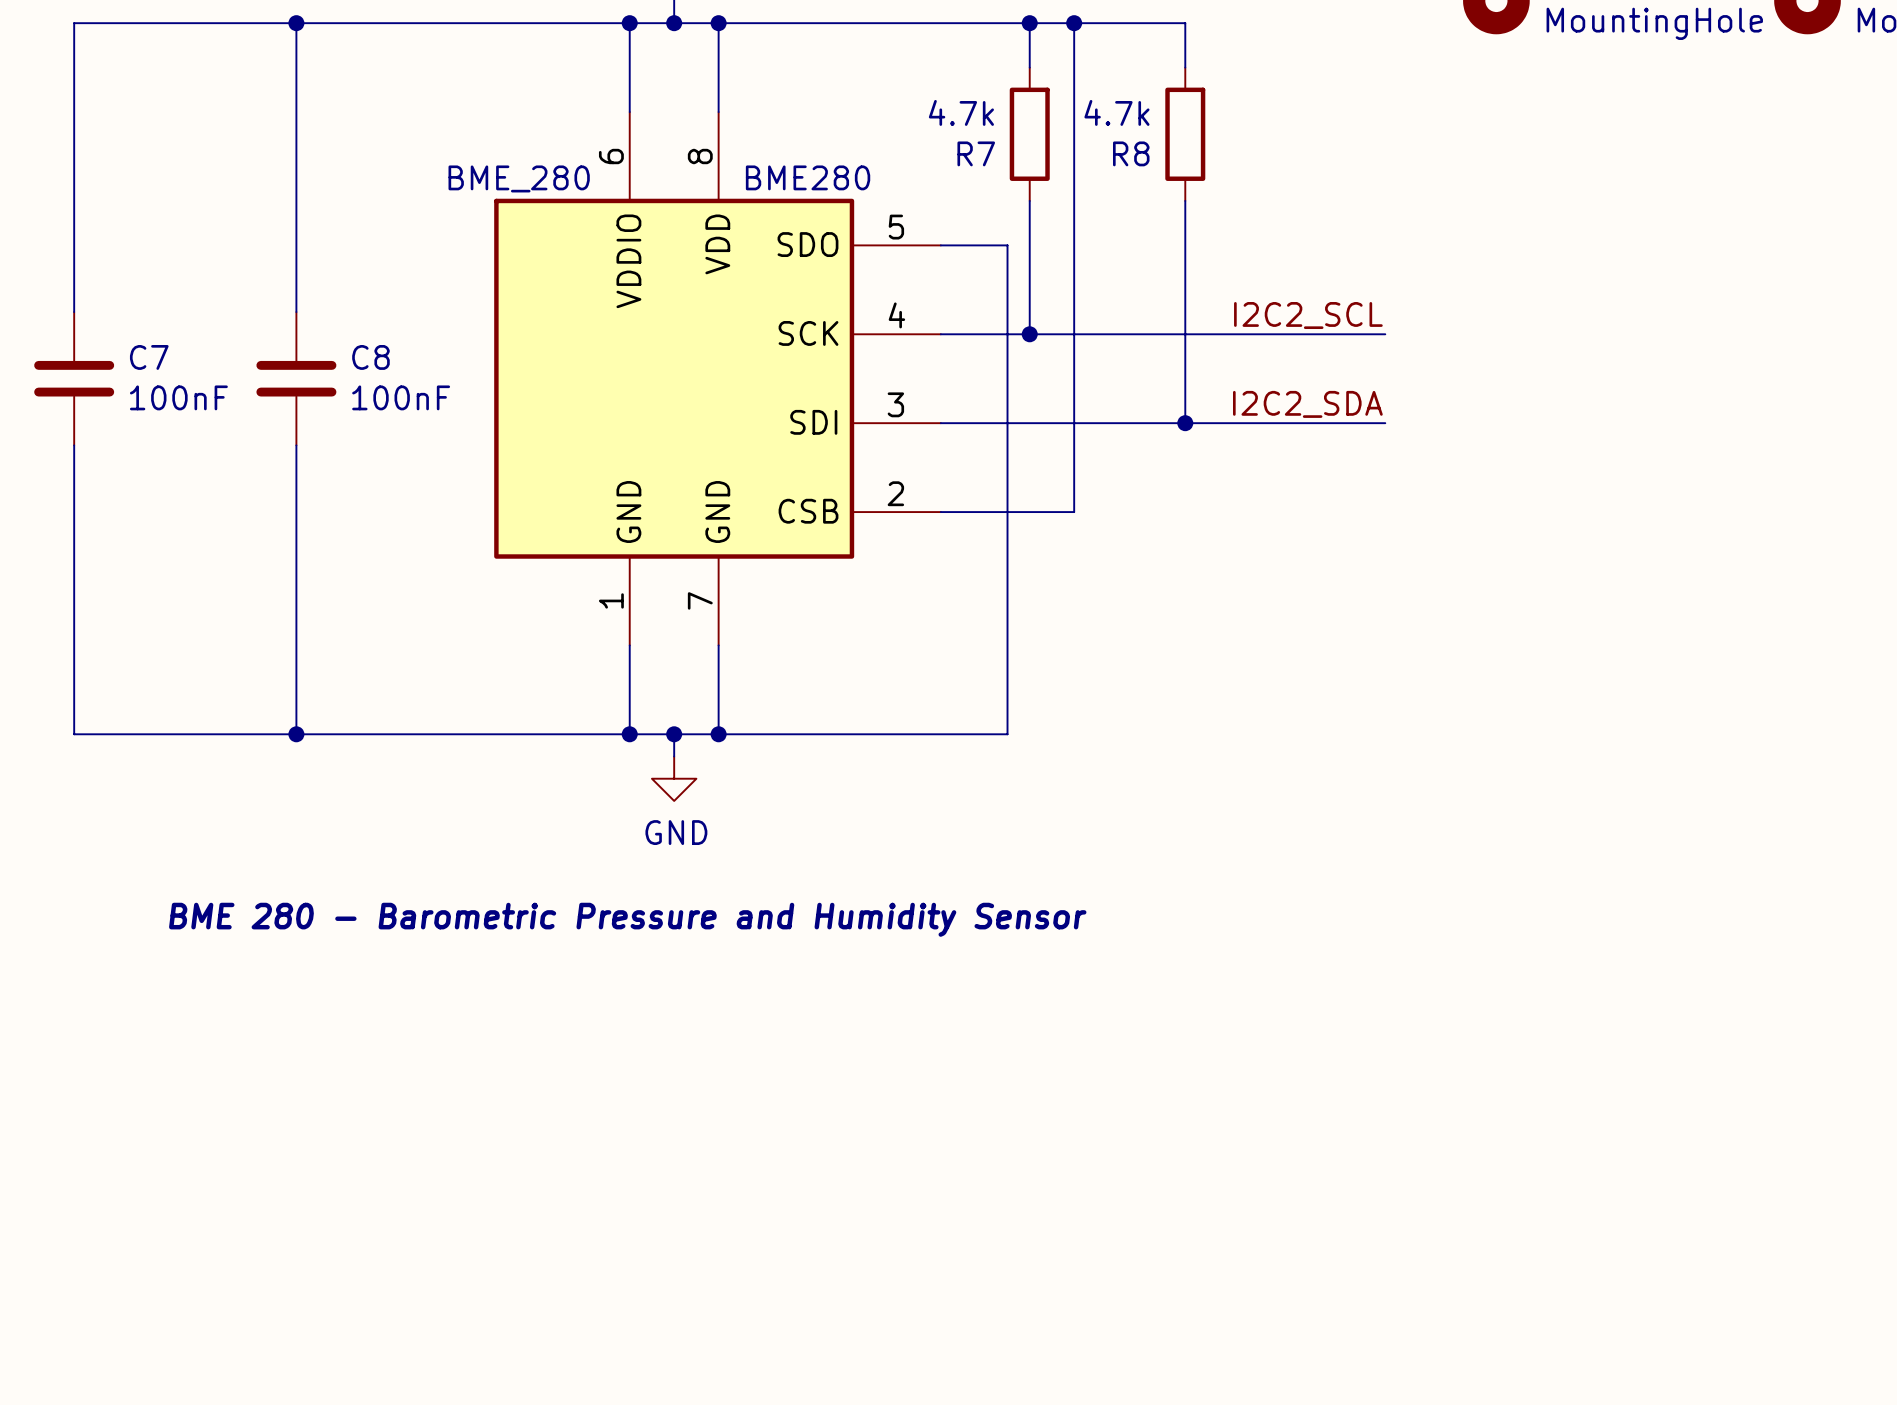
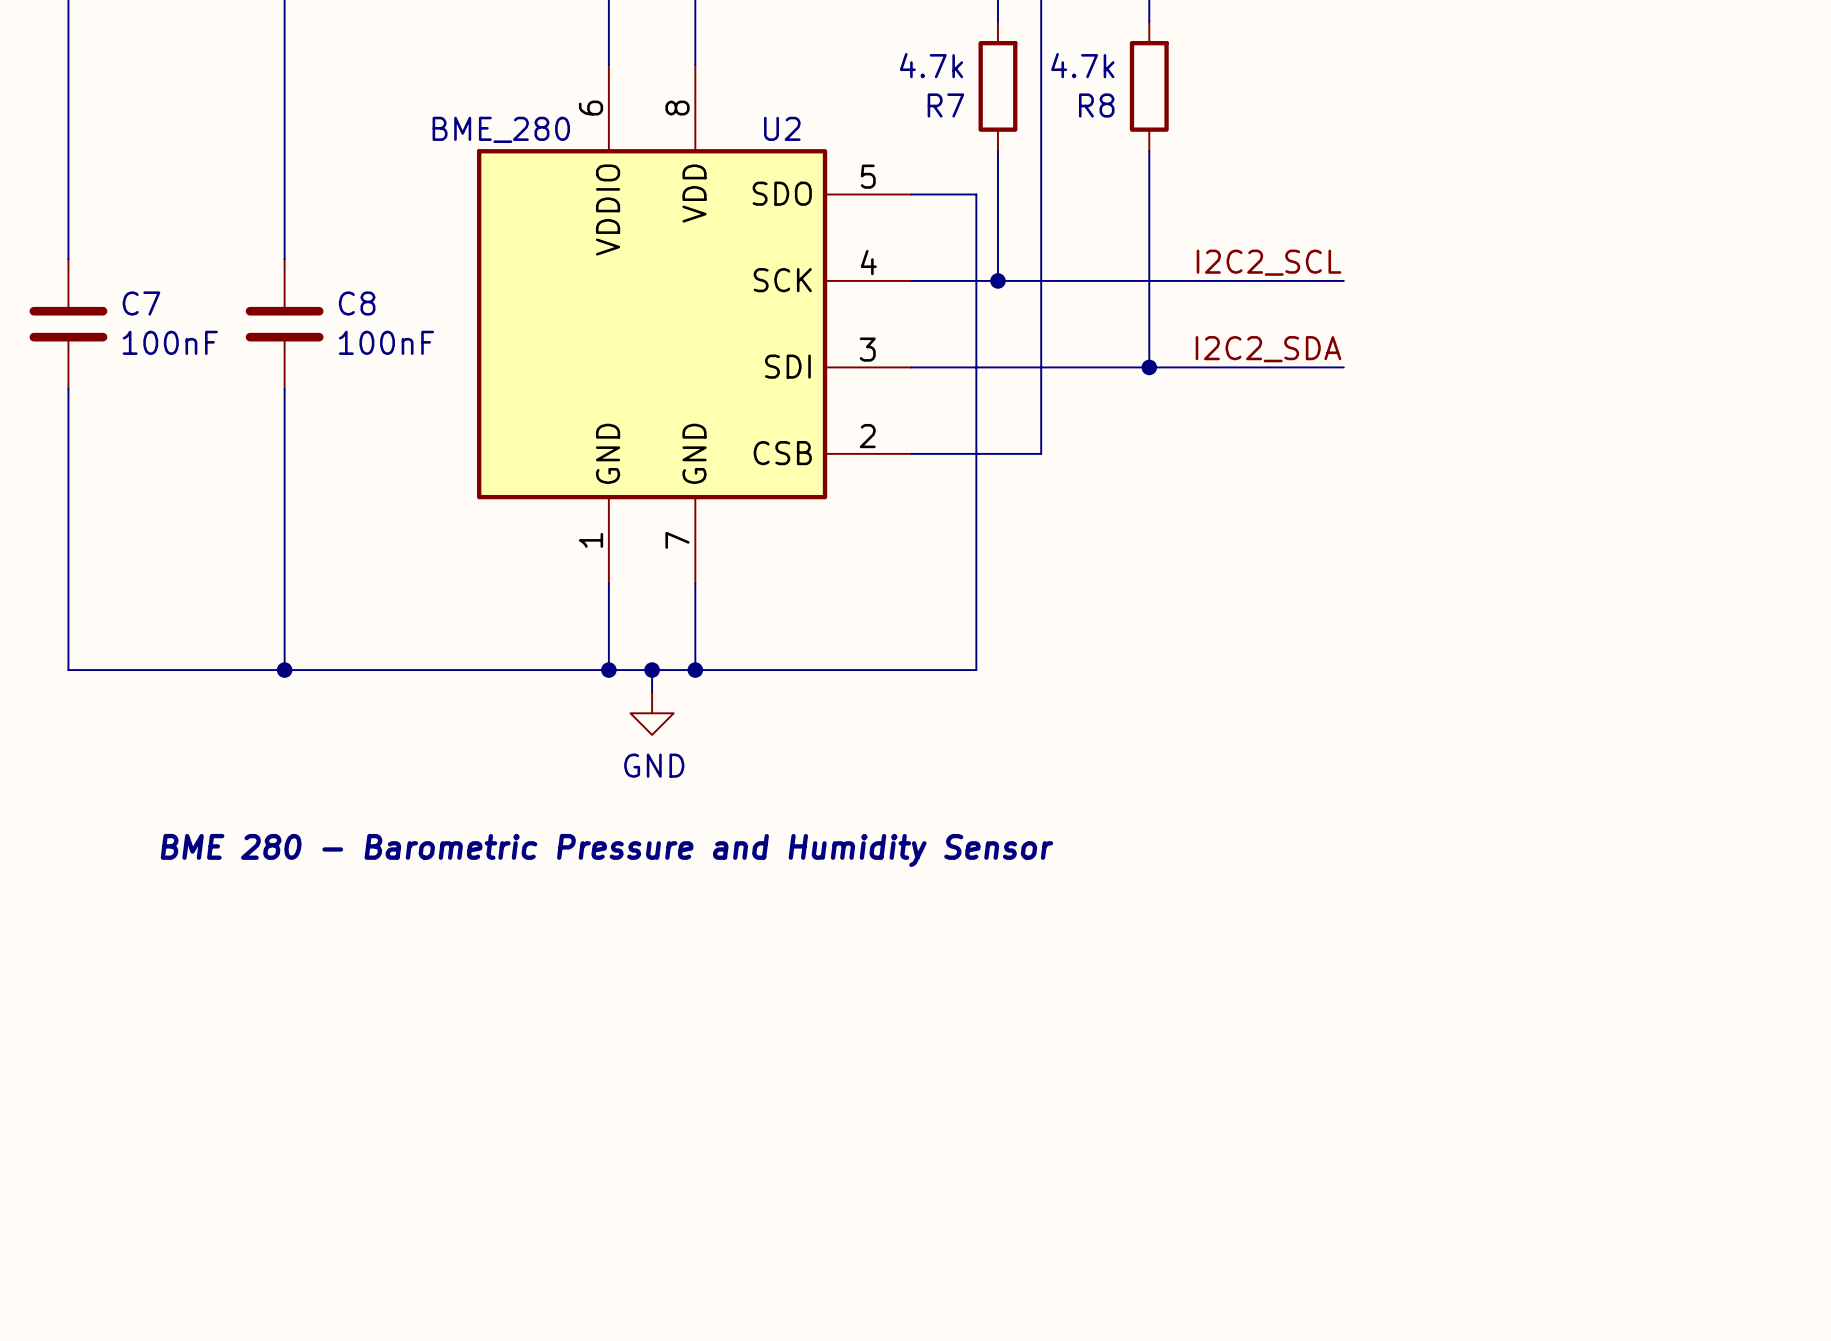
BME280 name: BME280 (808, 177) -> U2 (782, 128)

